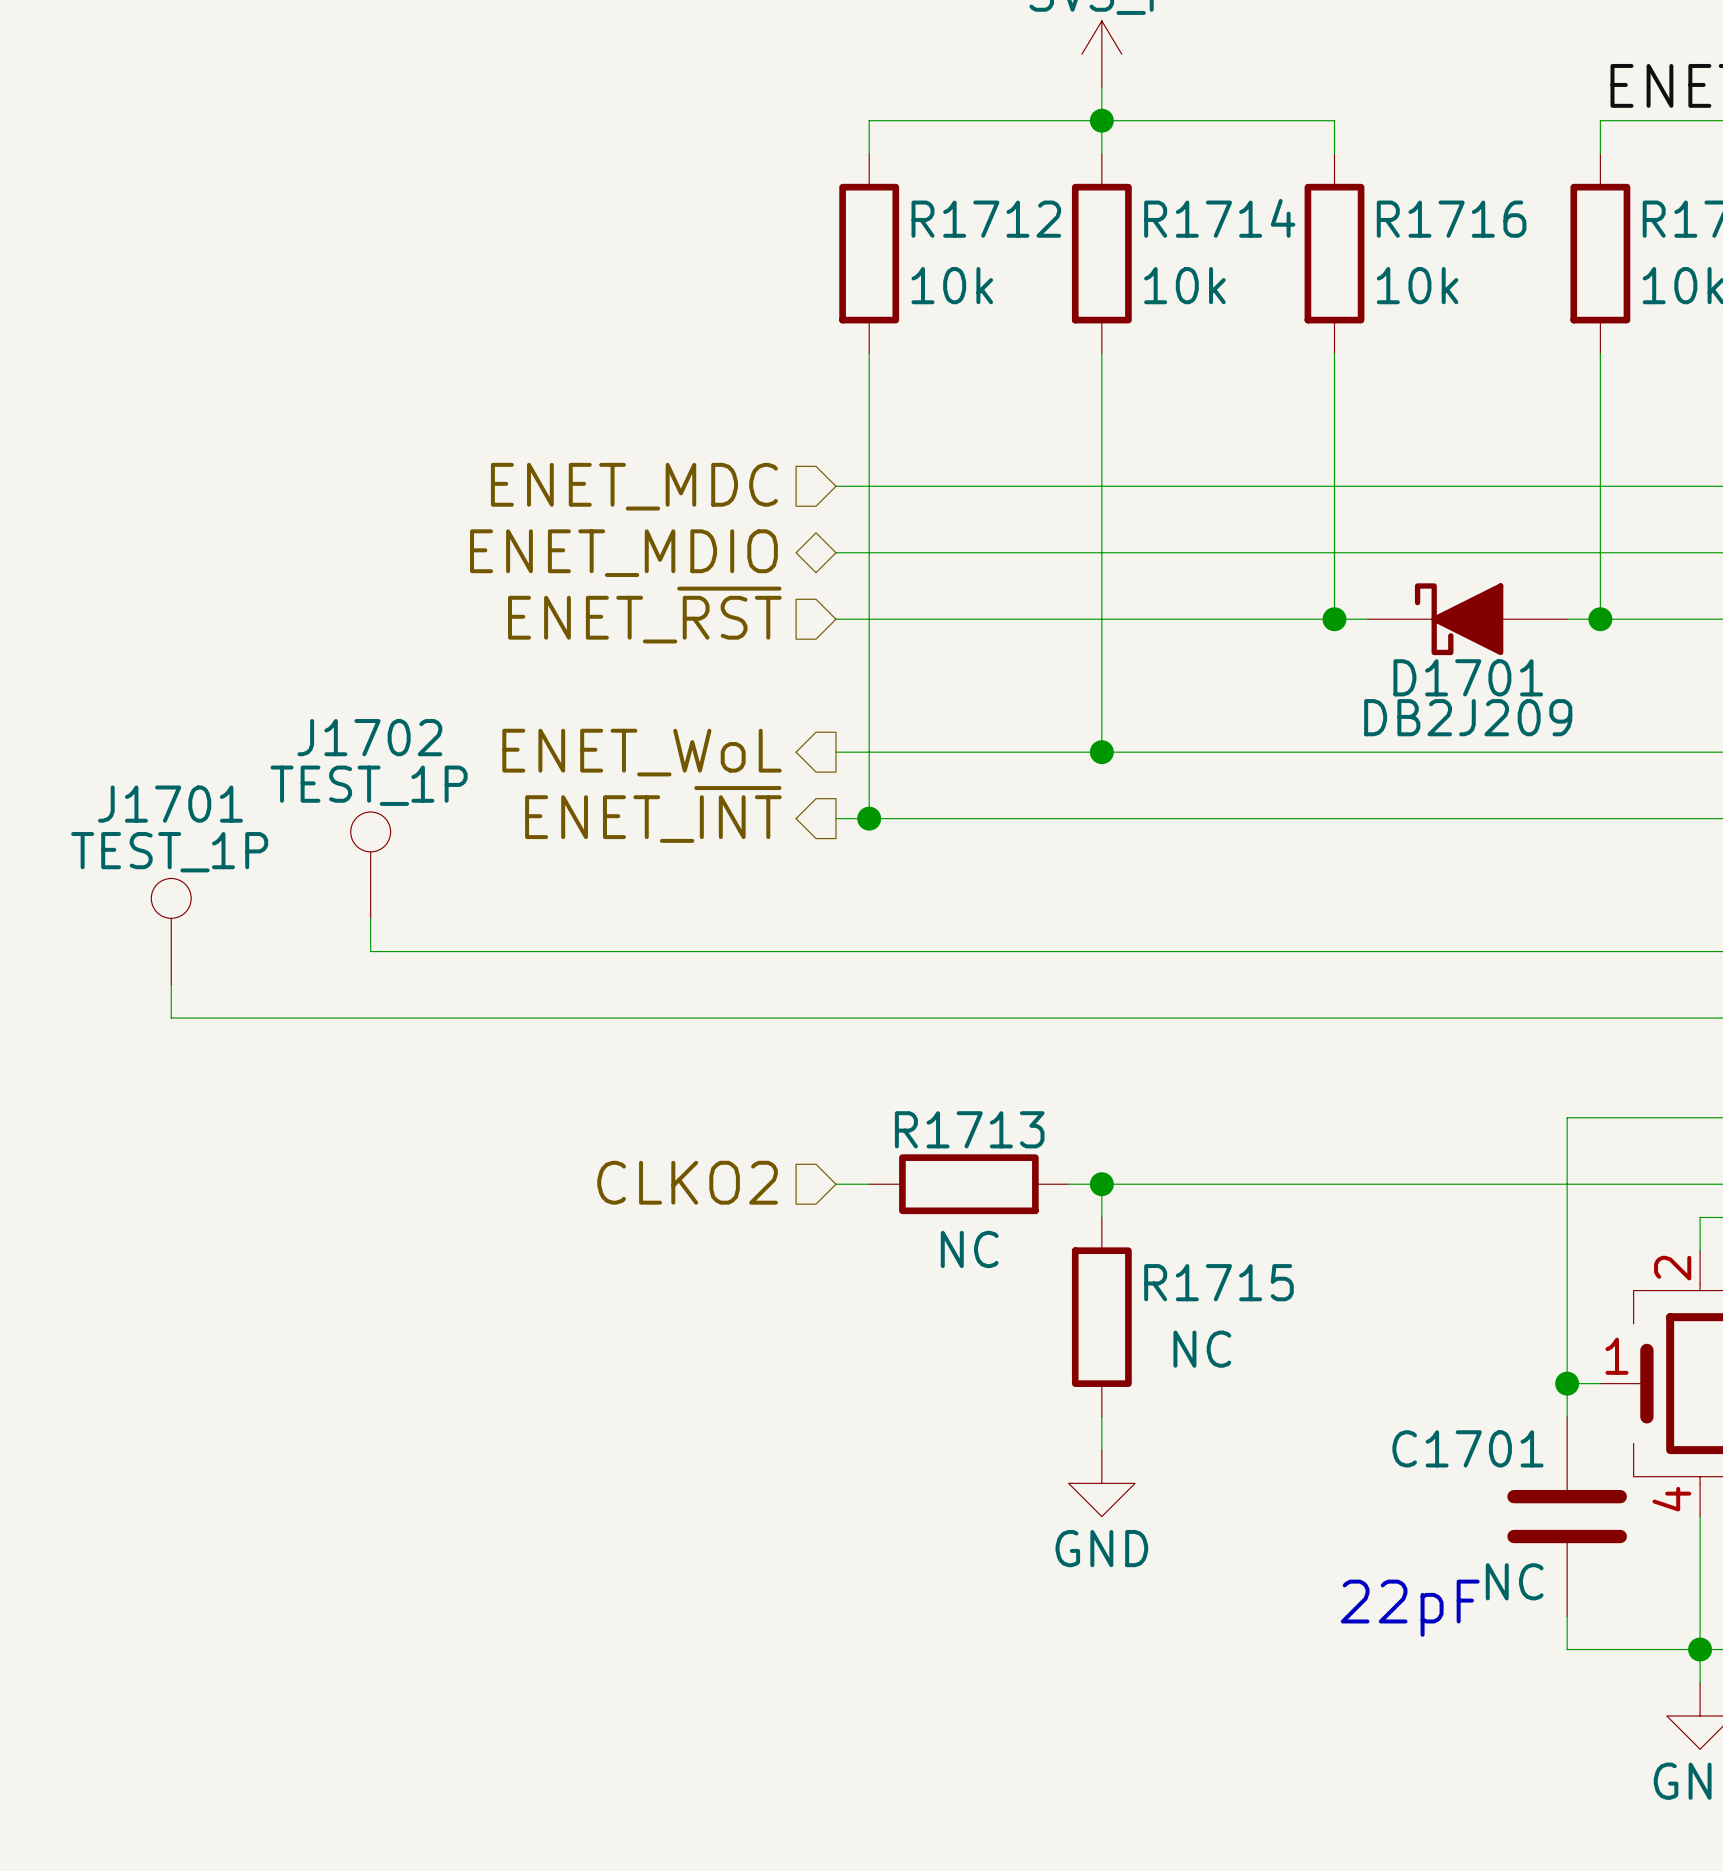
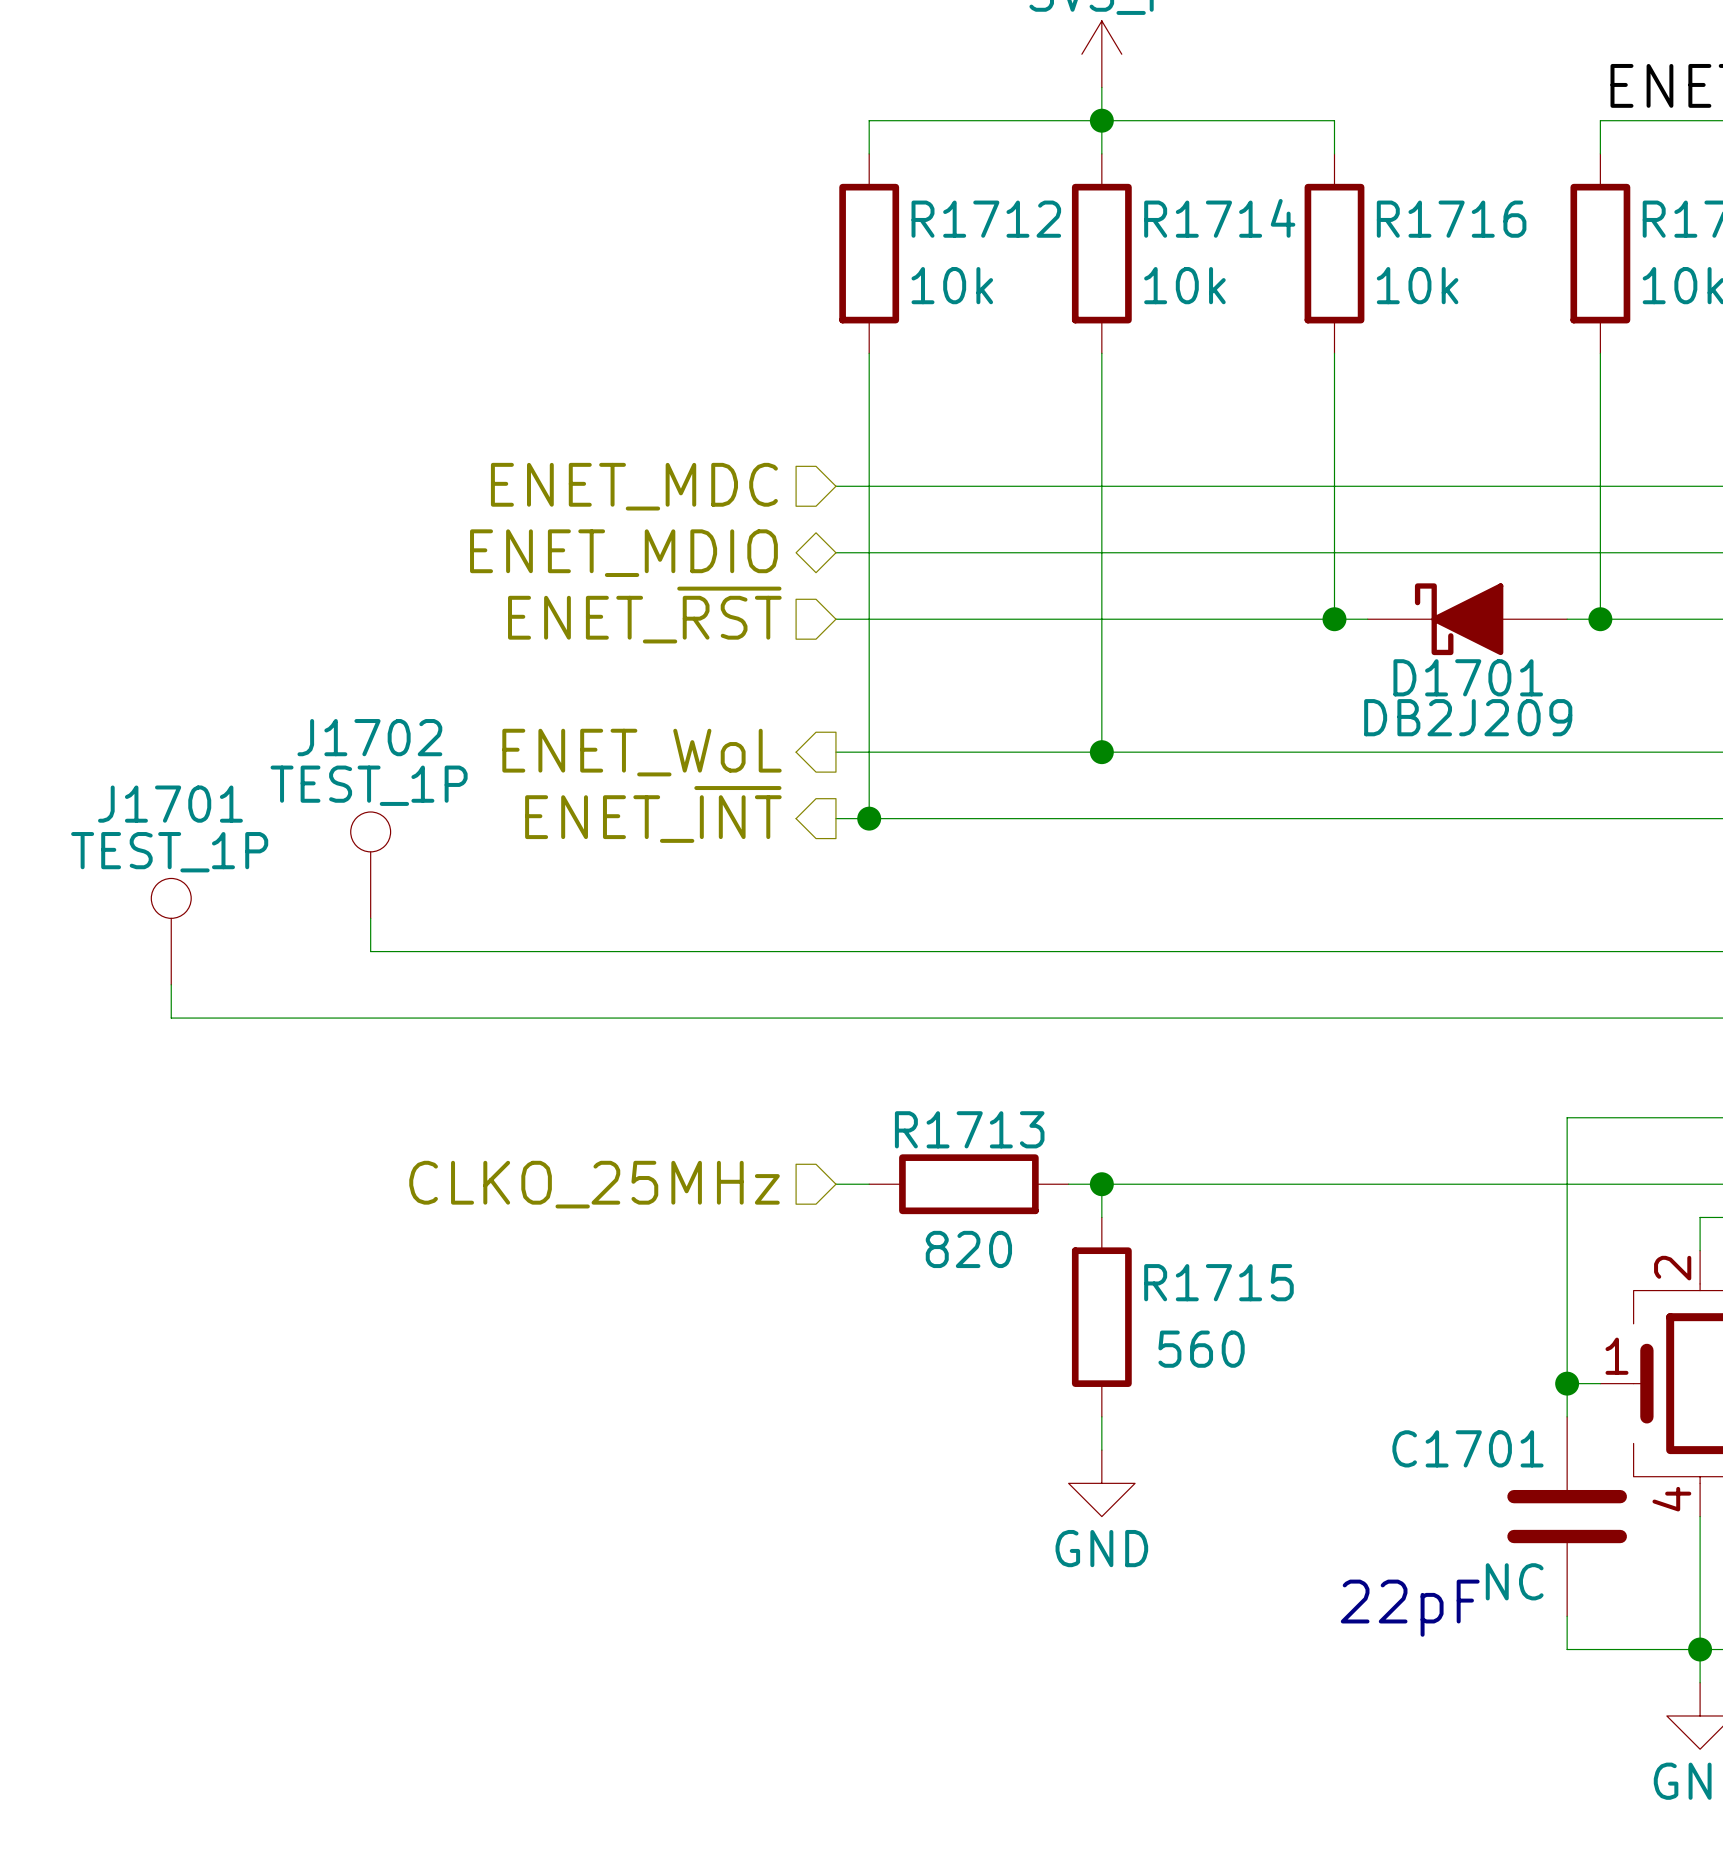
hierarchical label: CLKO2 (687, 1182) -> CLKO_25MHz (594, 1184)
R1713 value: NC (969, 1249) -> 820 (968, 1249)
R1715 value: NC (1202, 1349) -> 560 (1201, 1349)

